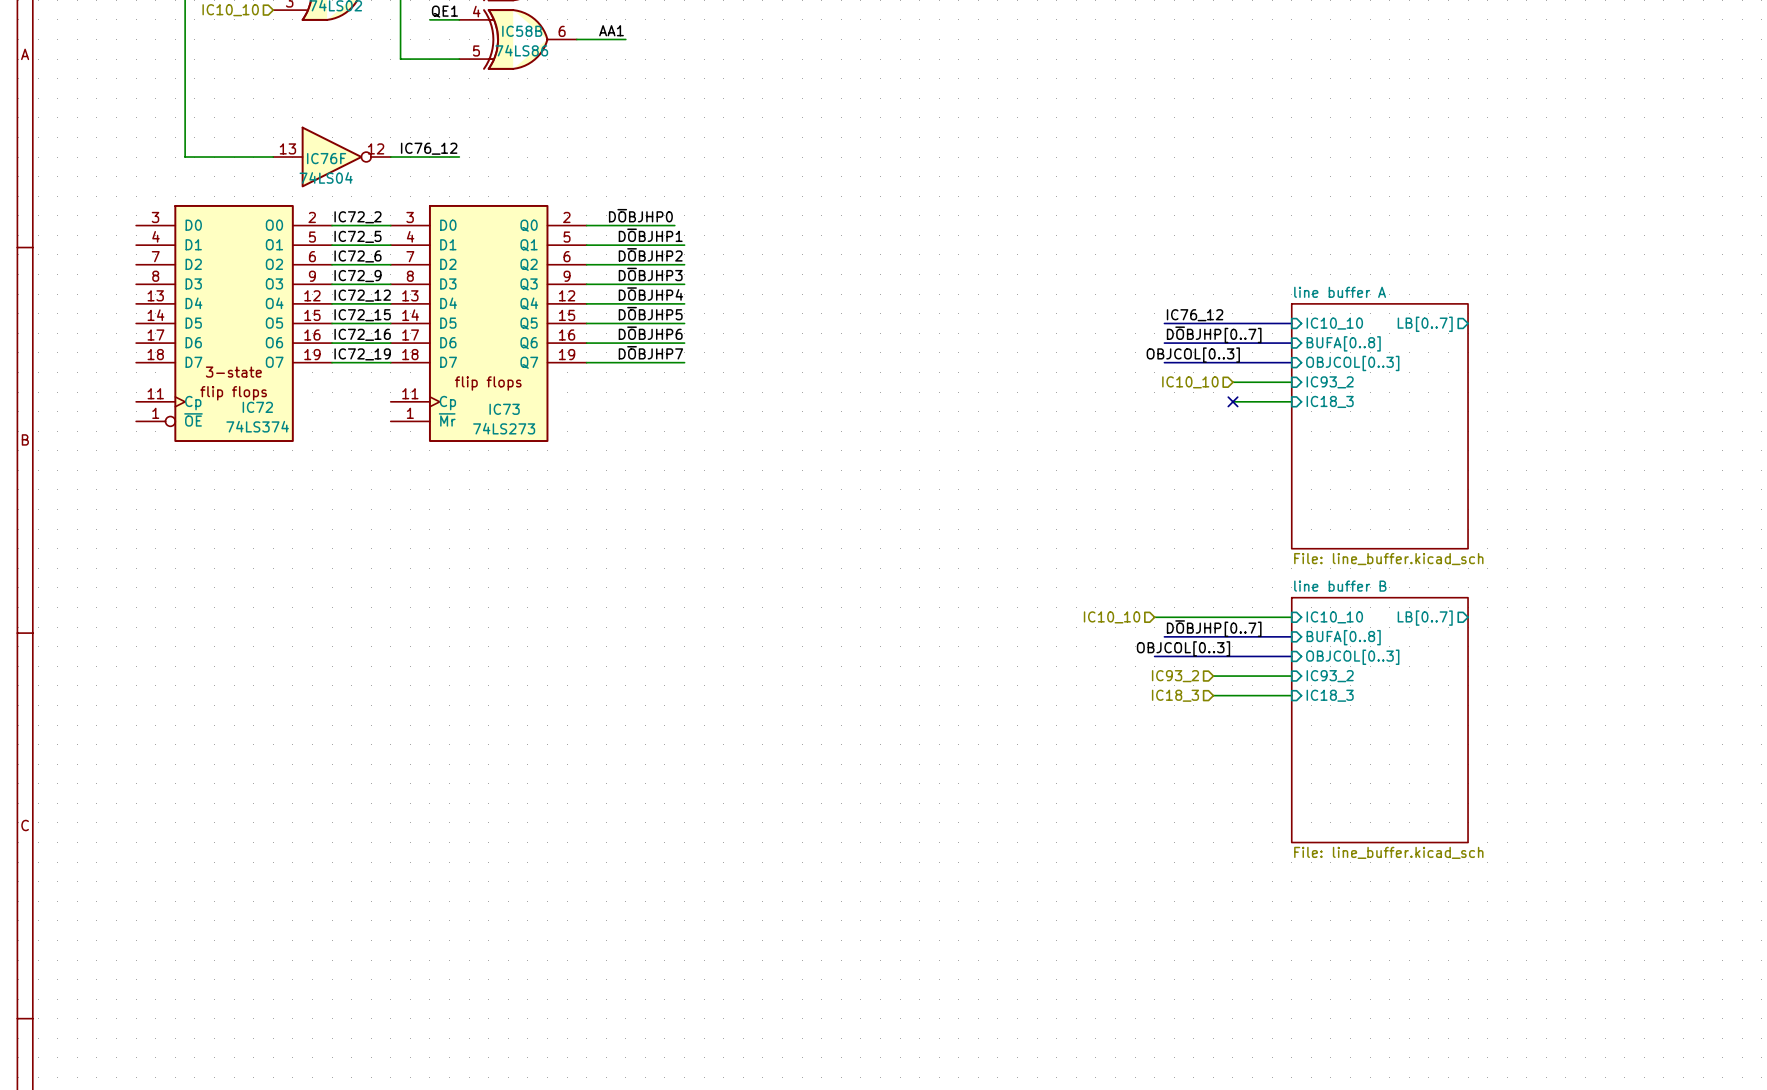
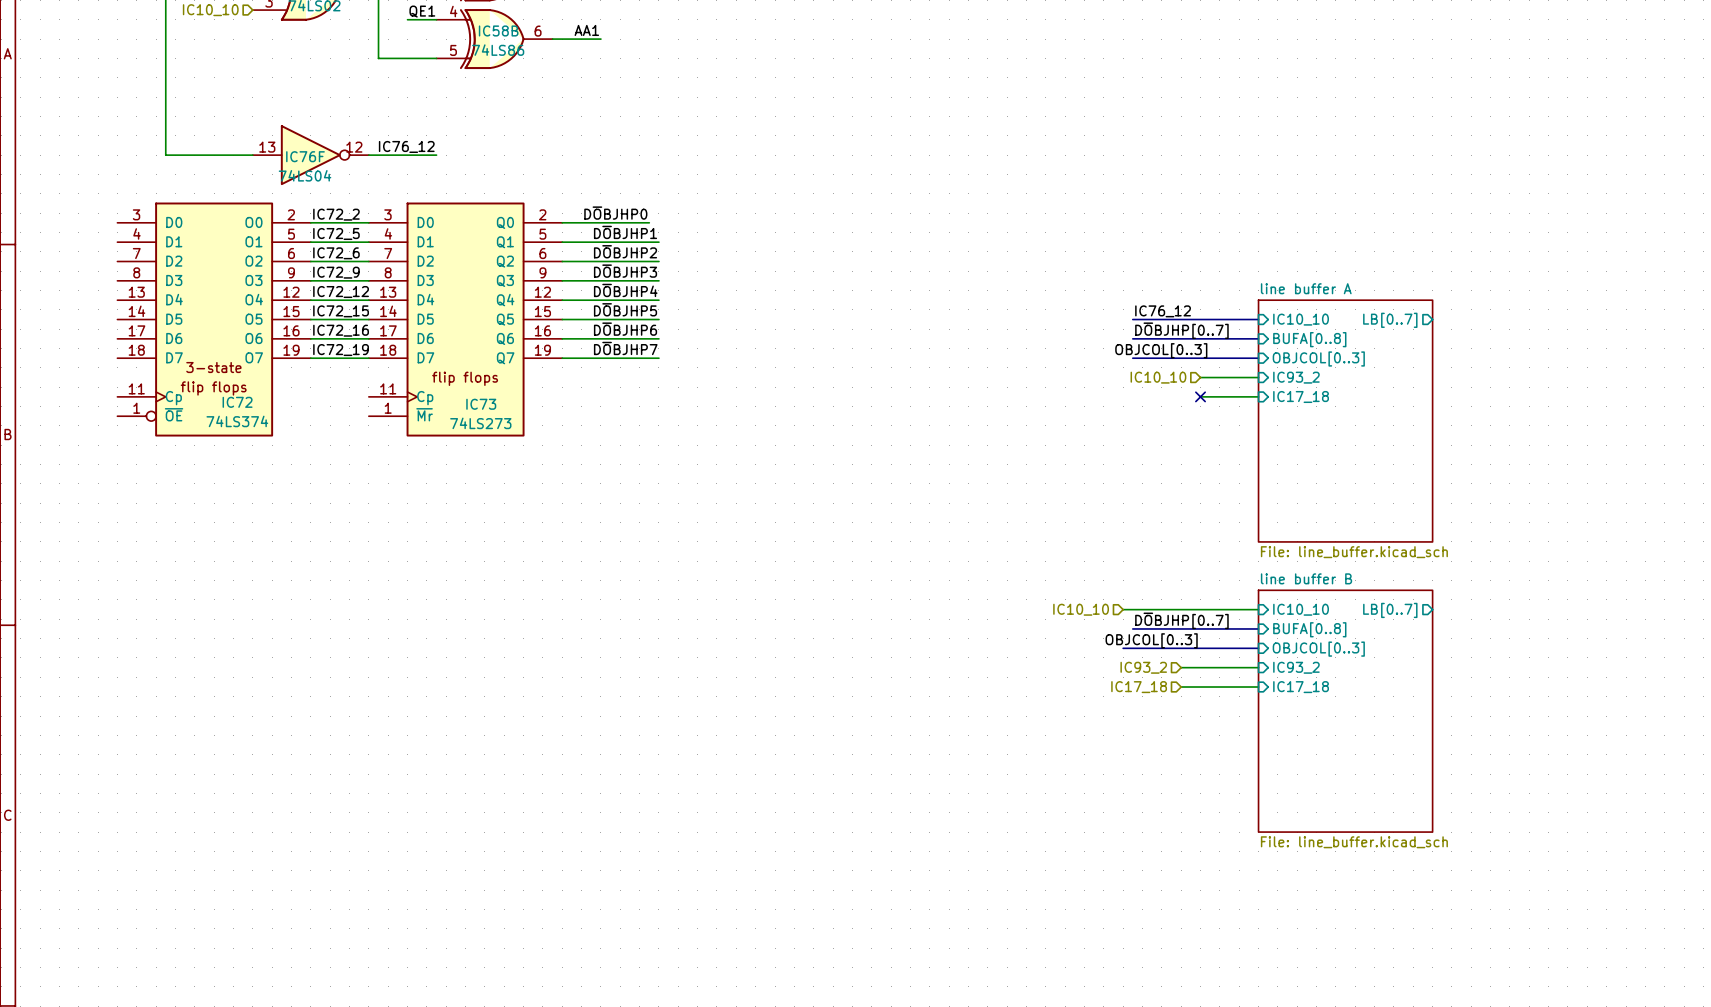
sheet pin: IC18_3 (1330, 401) -> IC17_18 (1301, 396)
hierarchical label: IC18_3 (1175, 695) -> IC17_18 (1139, 687)
sheet pin: IC18_3 (1330, 695) -> IC17_18 (1301, 687)

